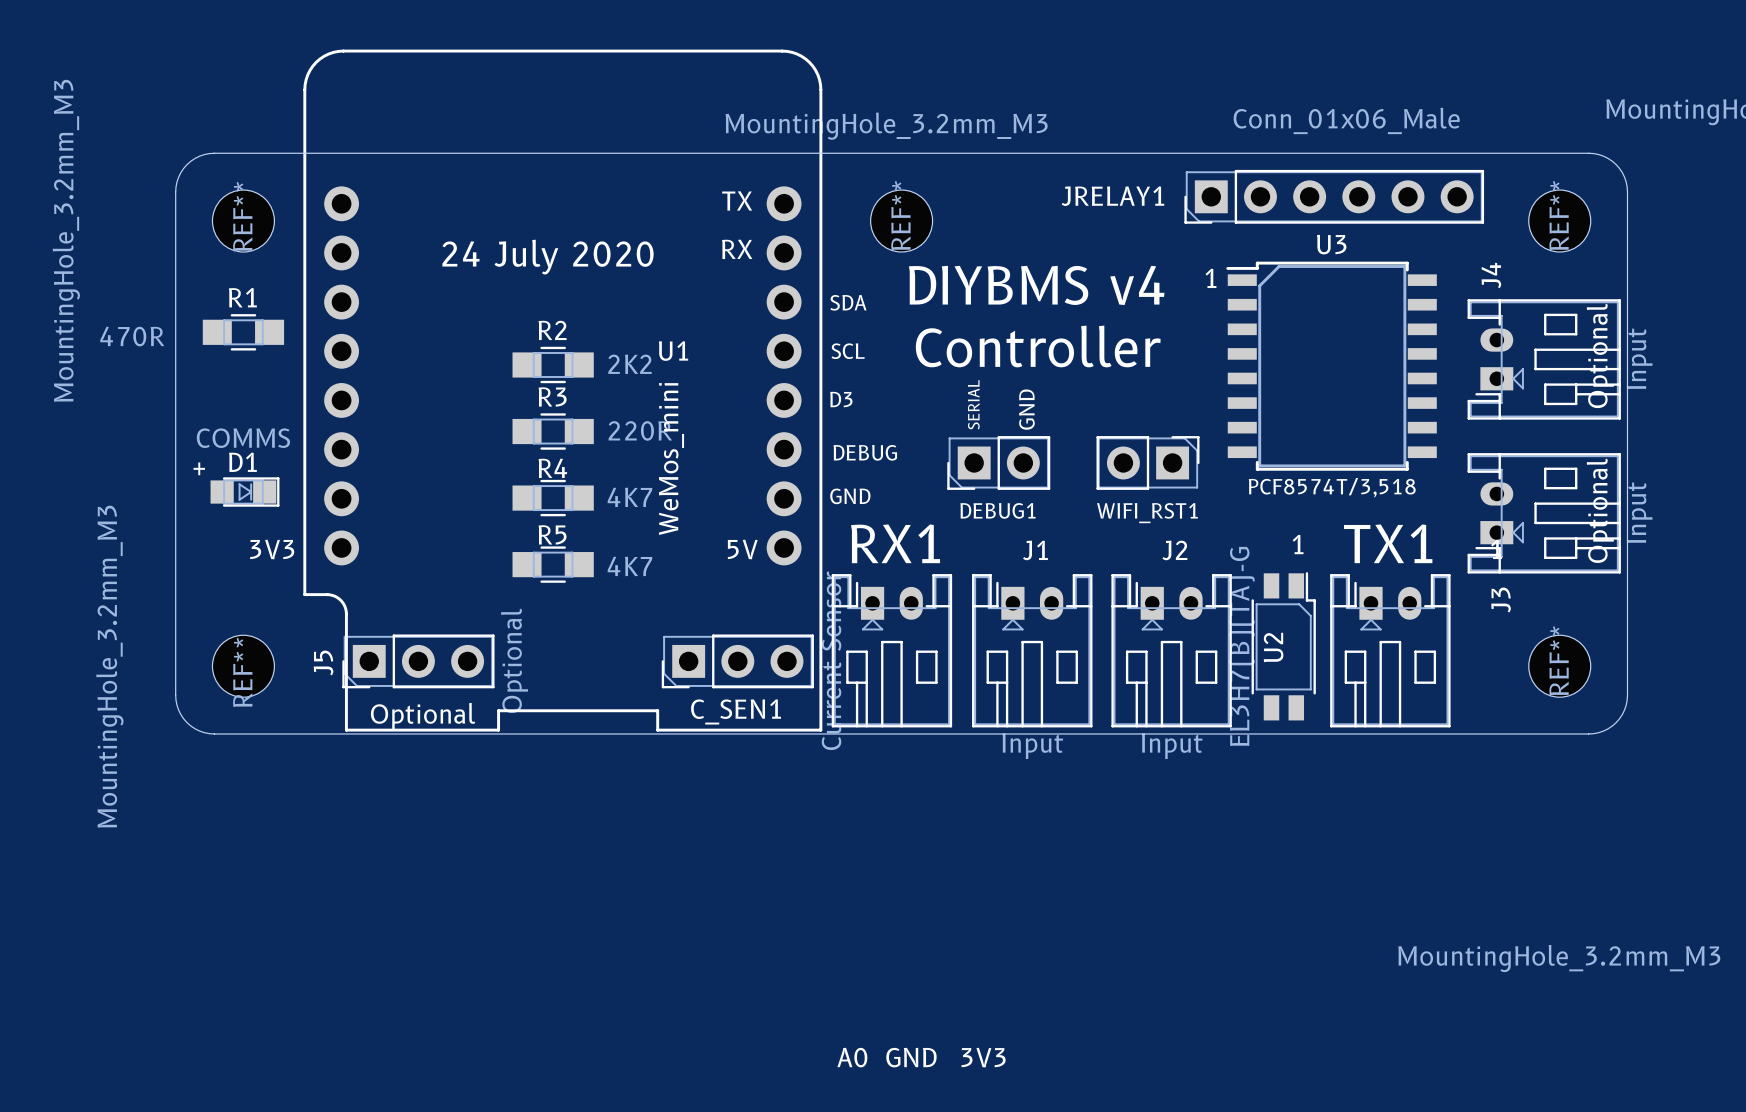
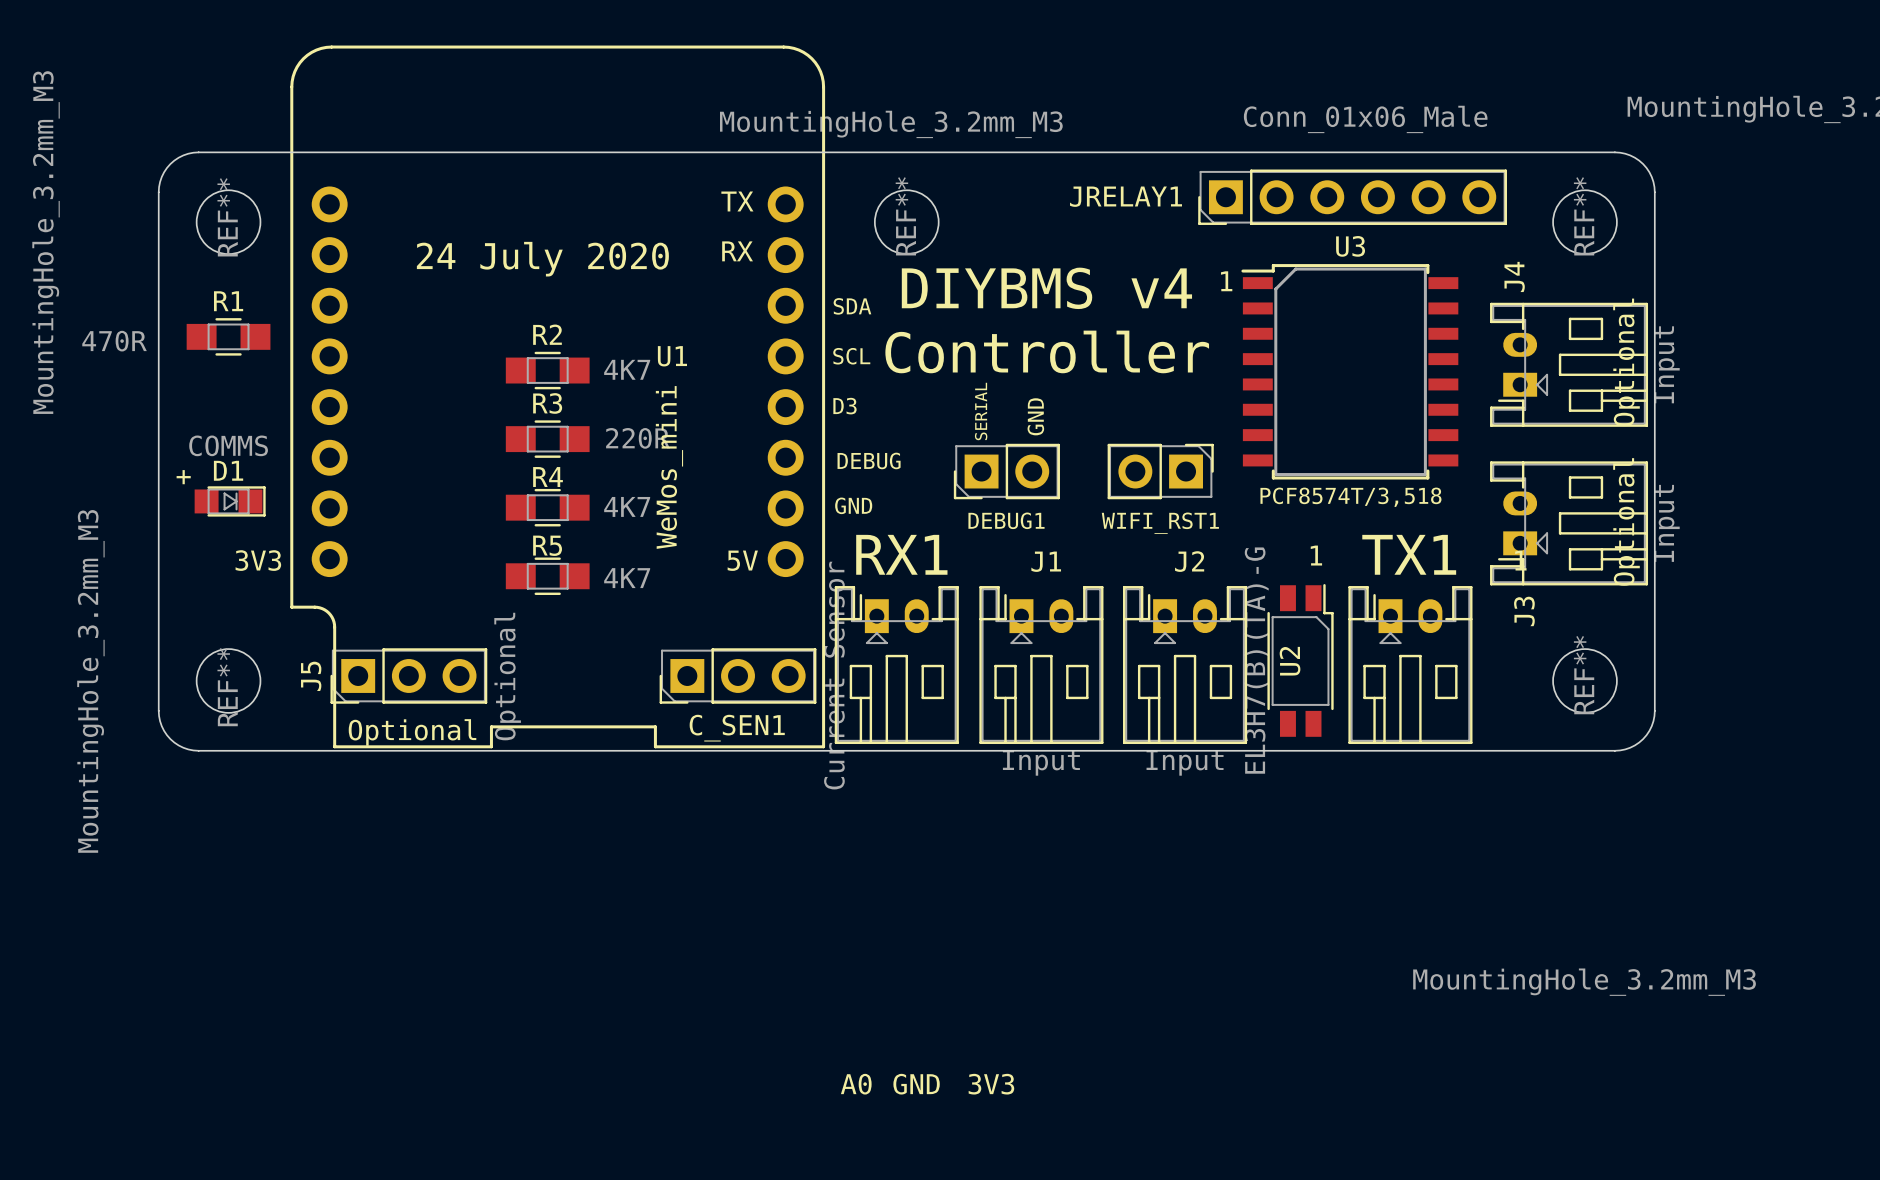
R2 value: 2K2 (630, 364) -> 4K7 (627, 369)

